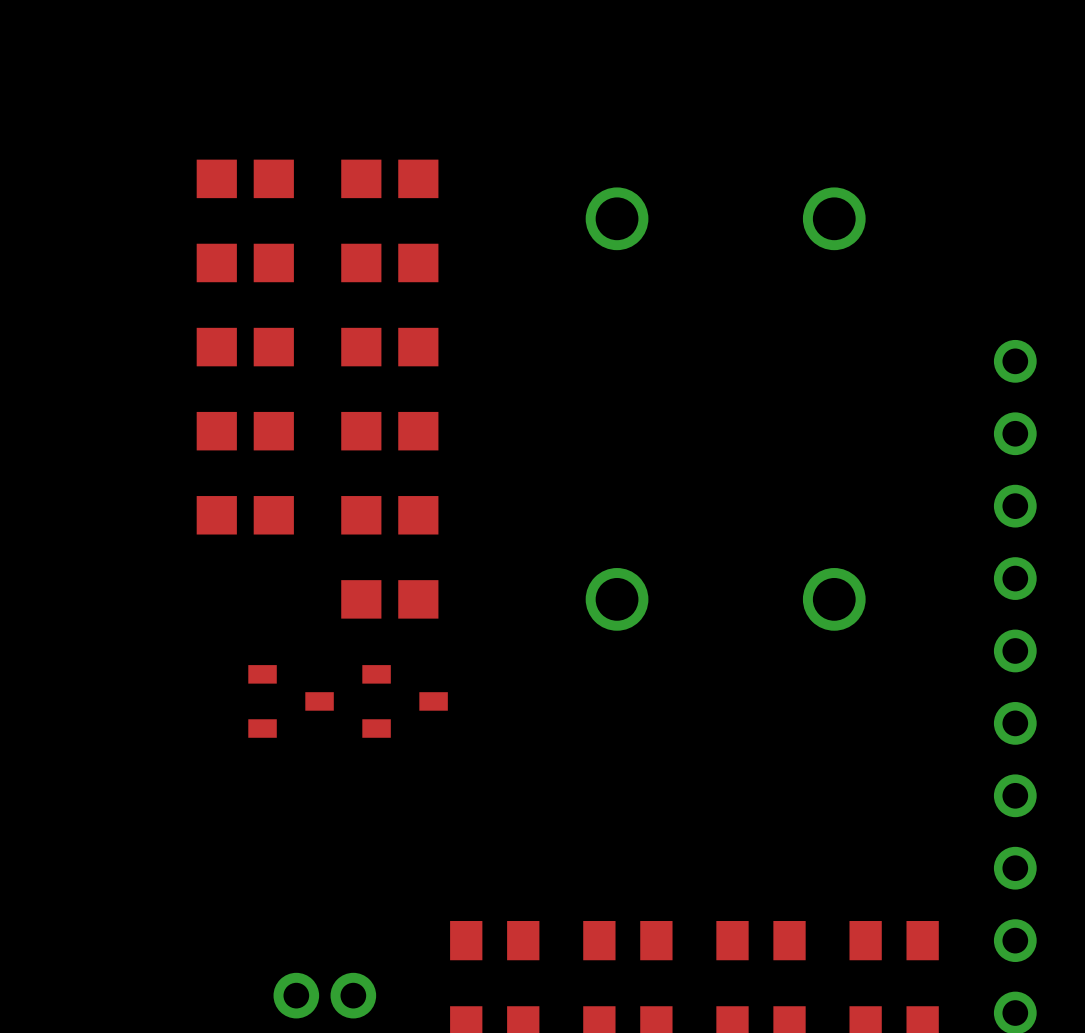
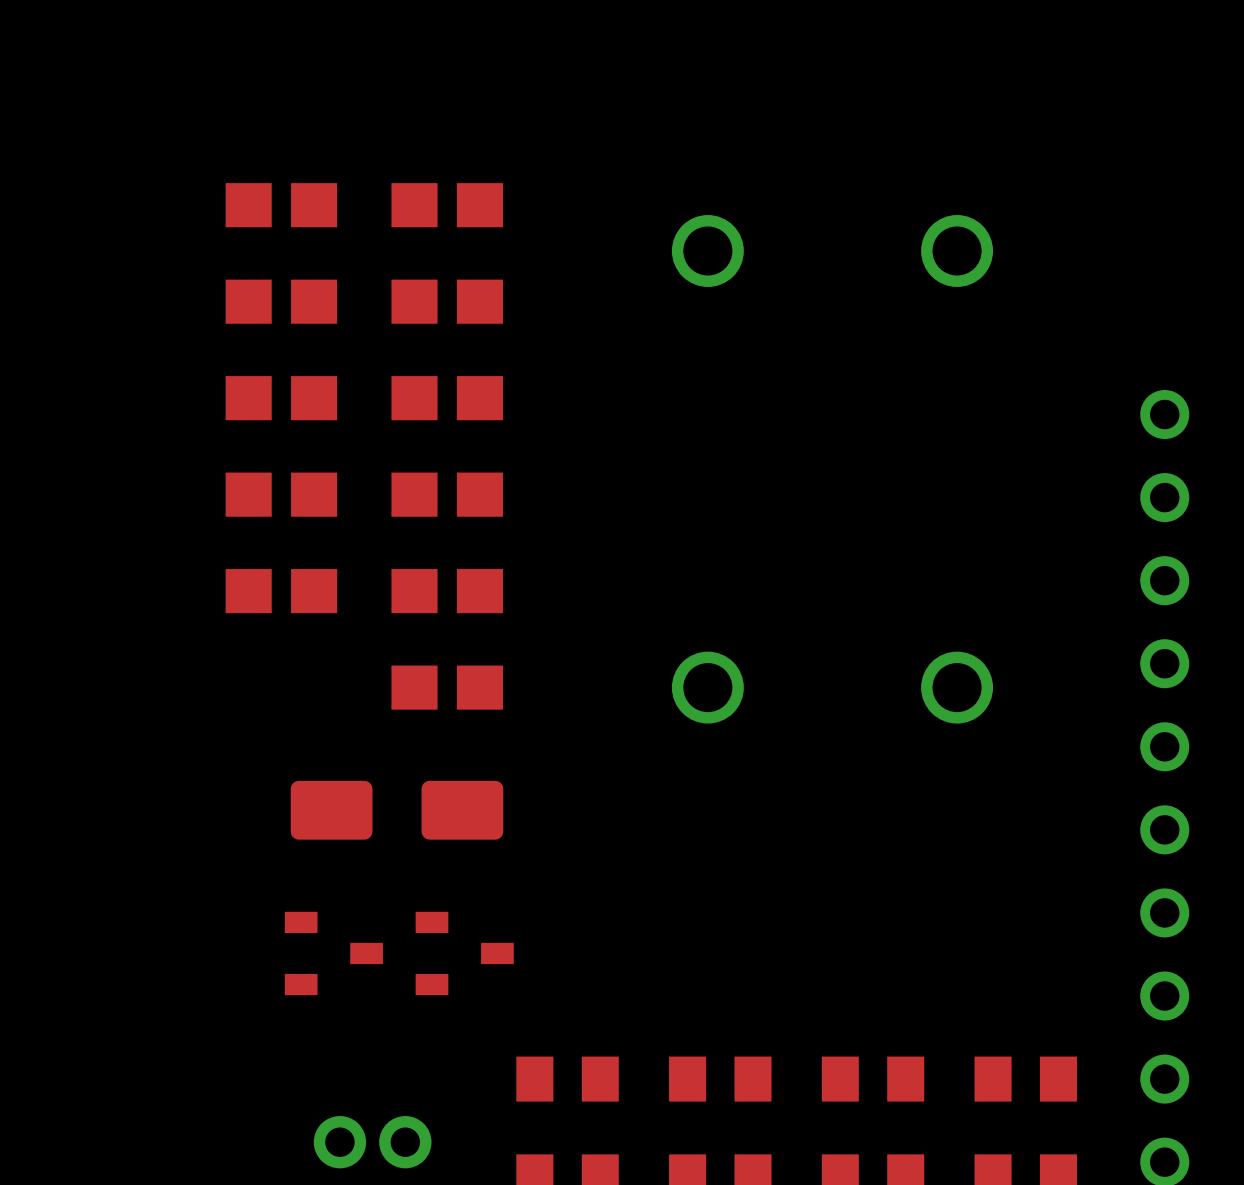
part: (291, 701) -> none
part: (405, 701) -> none
part: none -> (397, 810)
part: none -> (333, 953)
part: none -> (464, 953)

